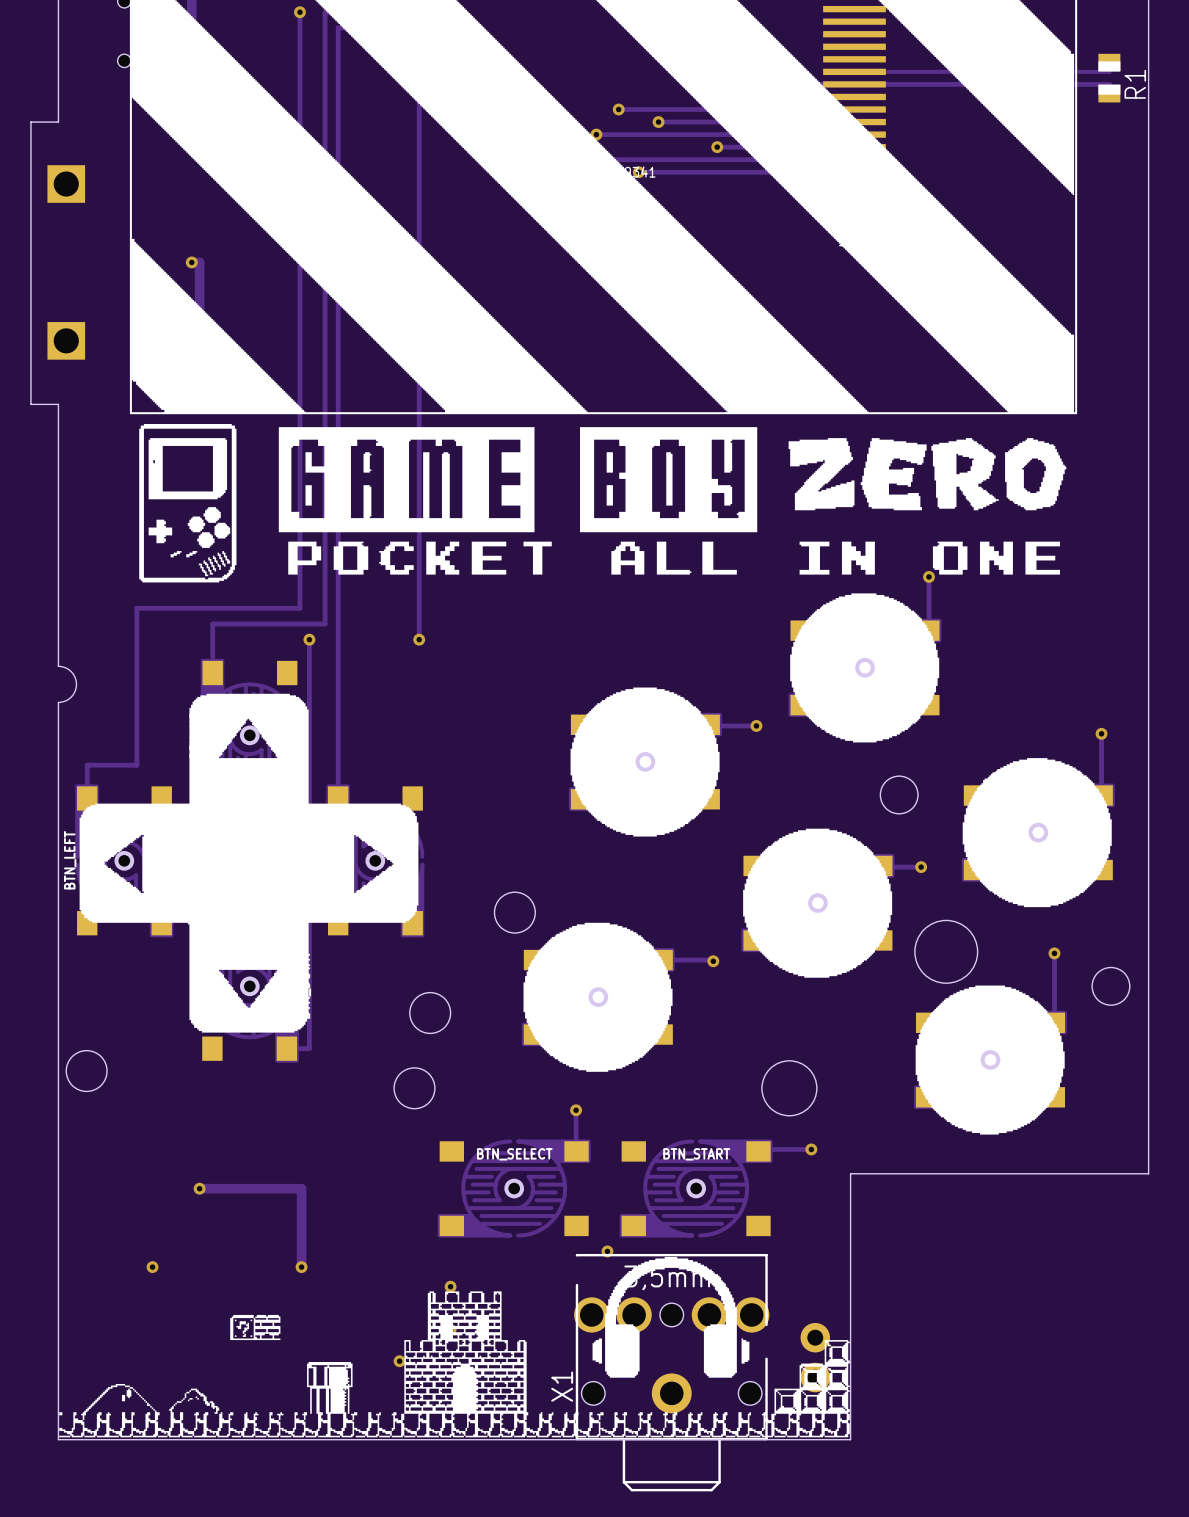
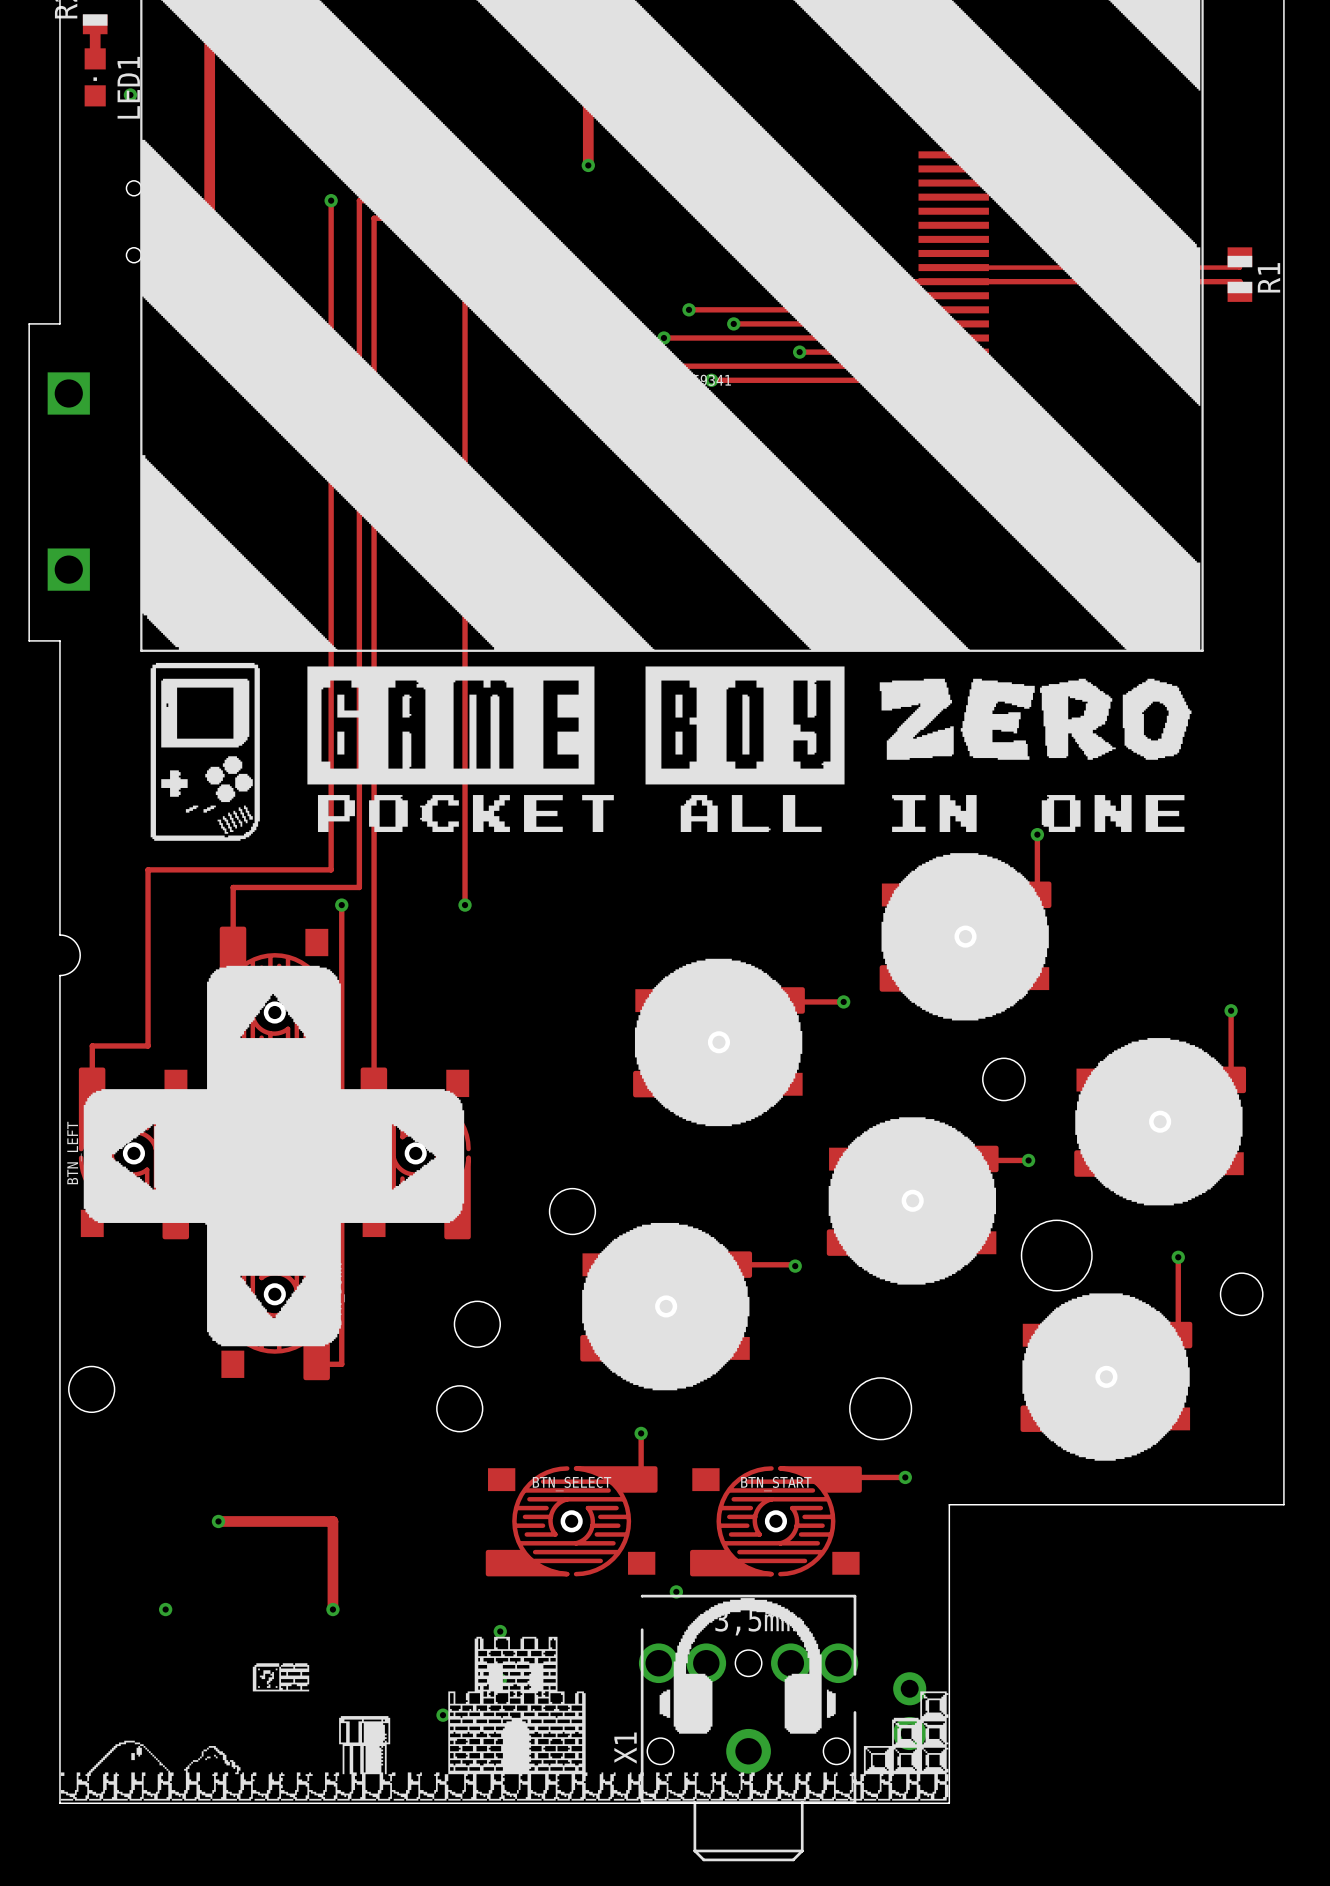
track: (191, 262) (199, 262) (199, 357) -> none
via: (191, 262) -> none

